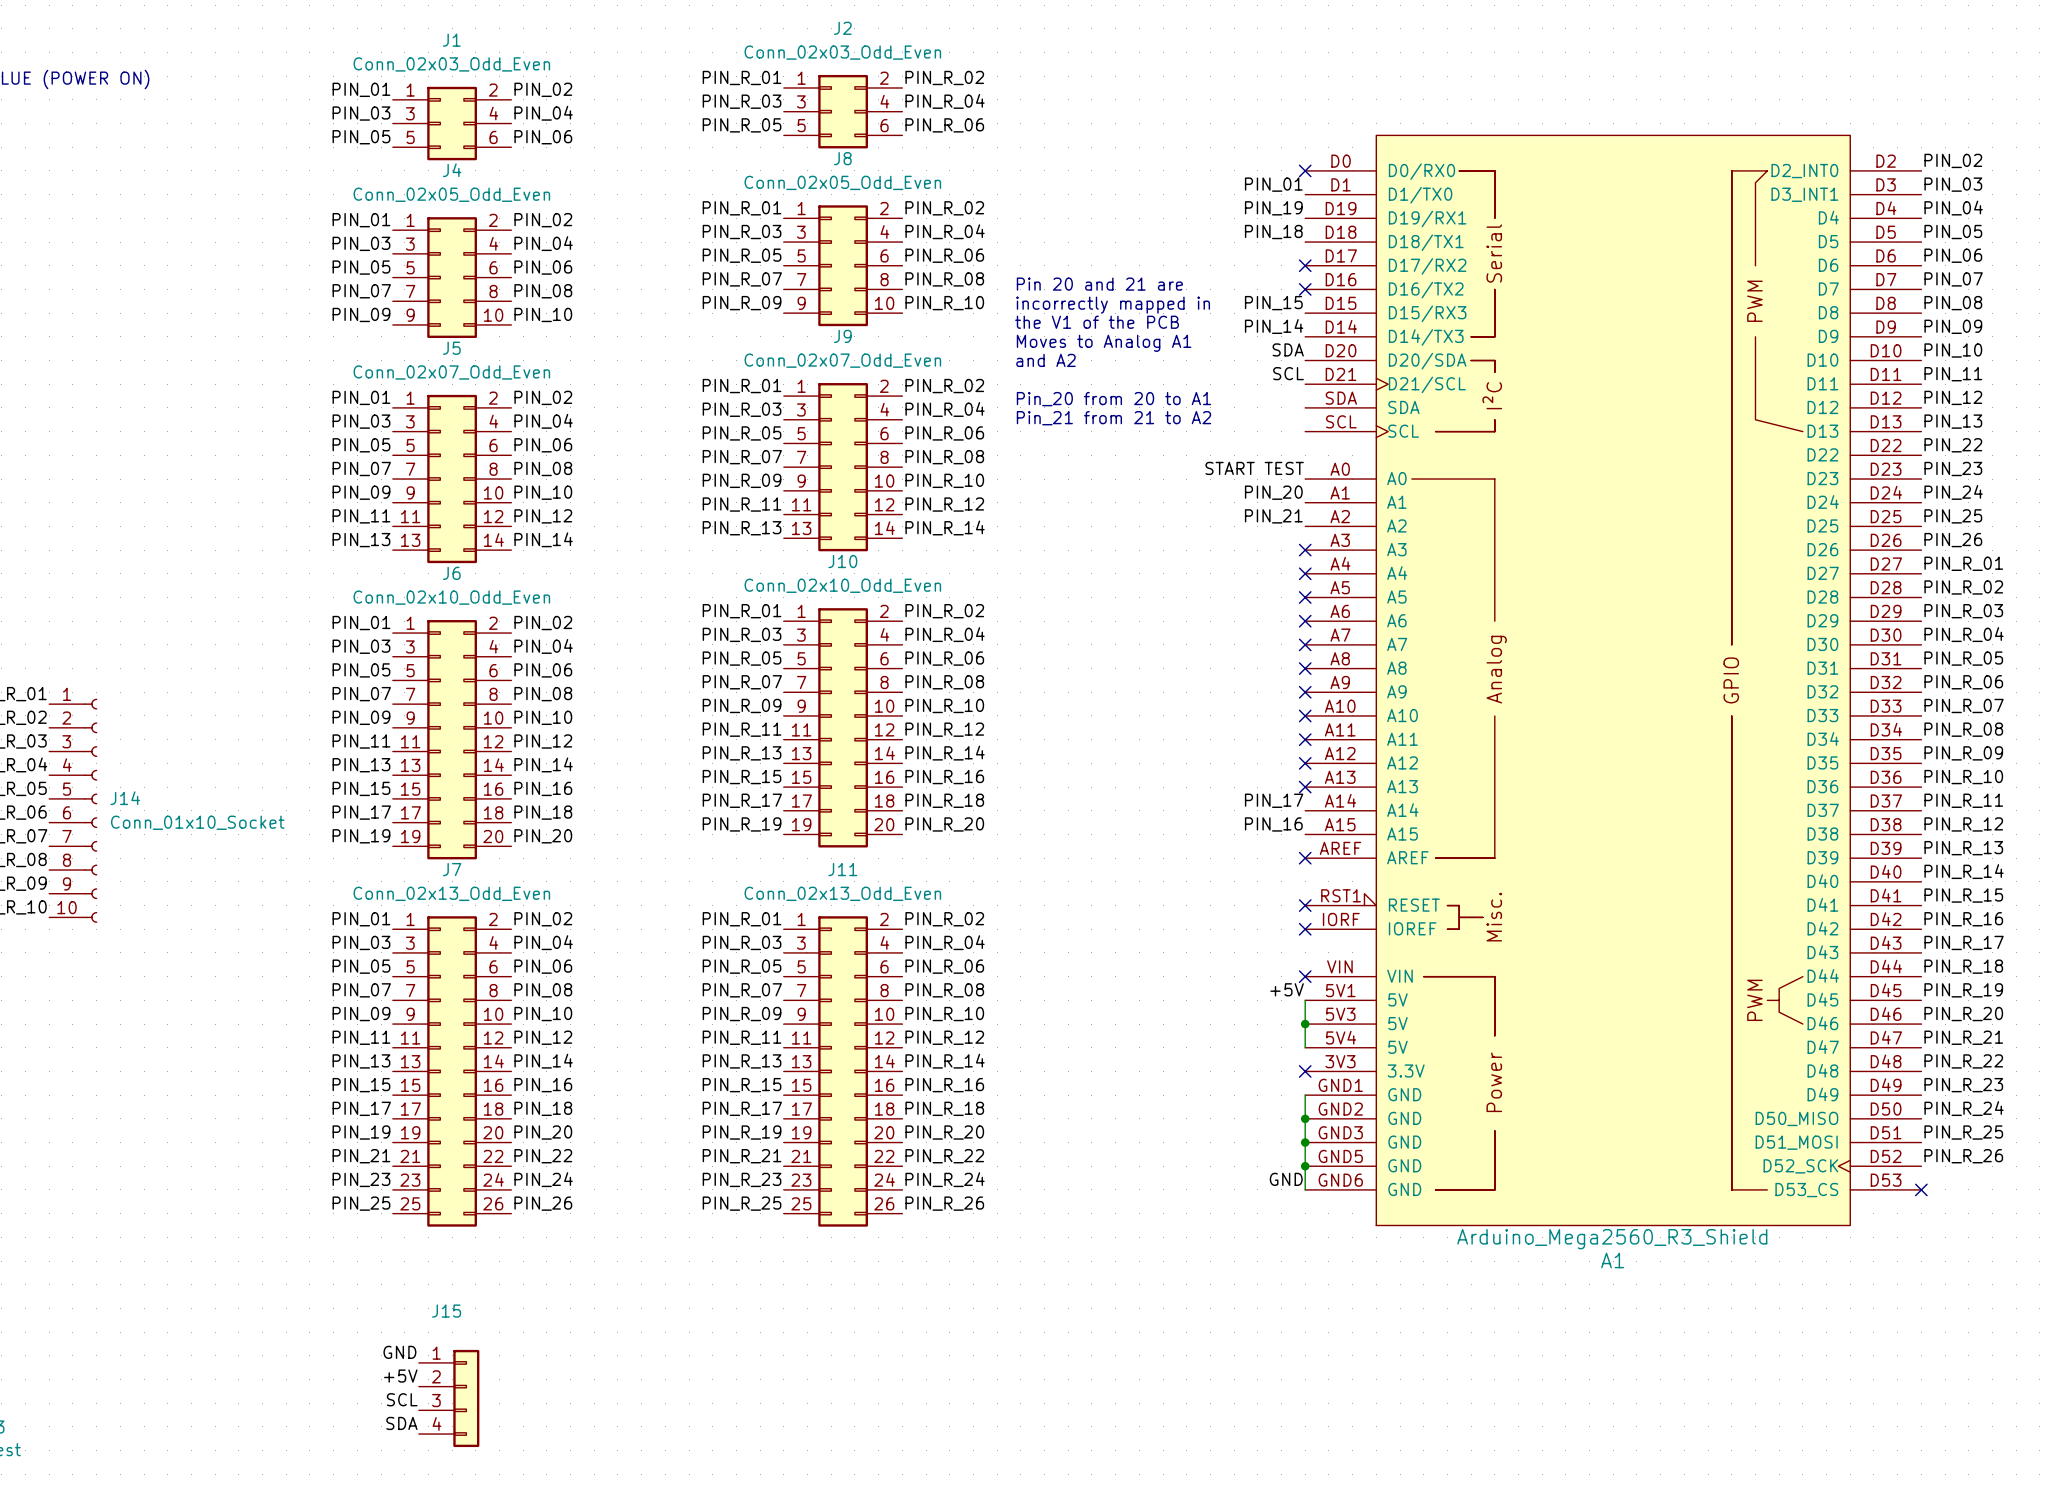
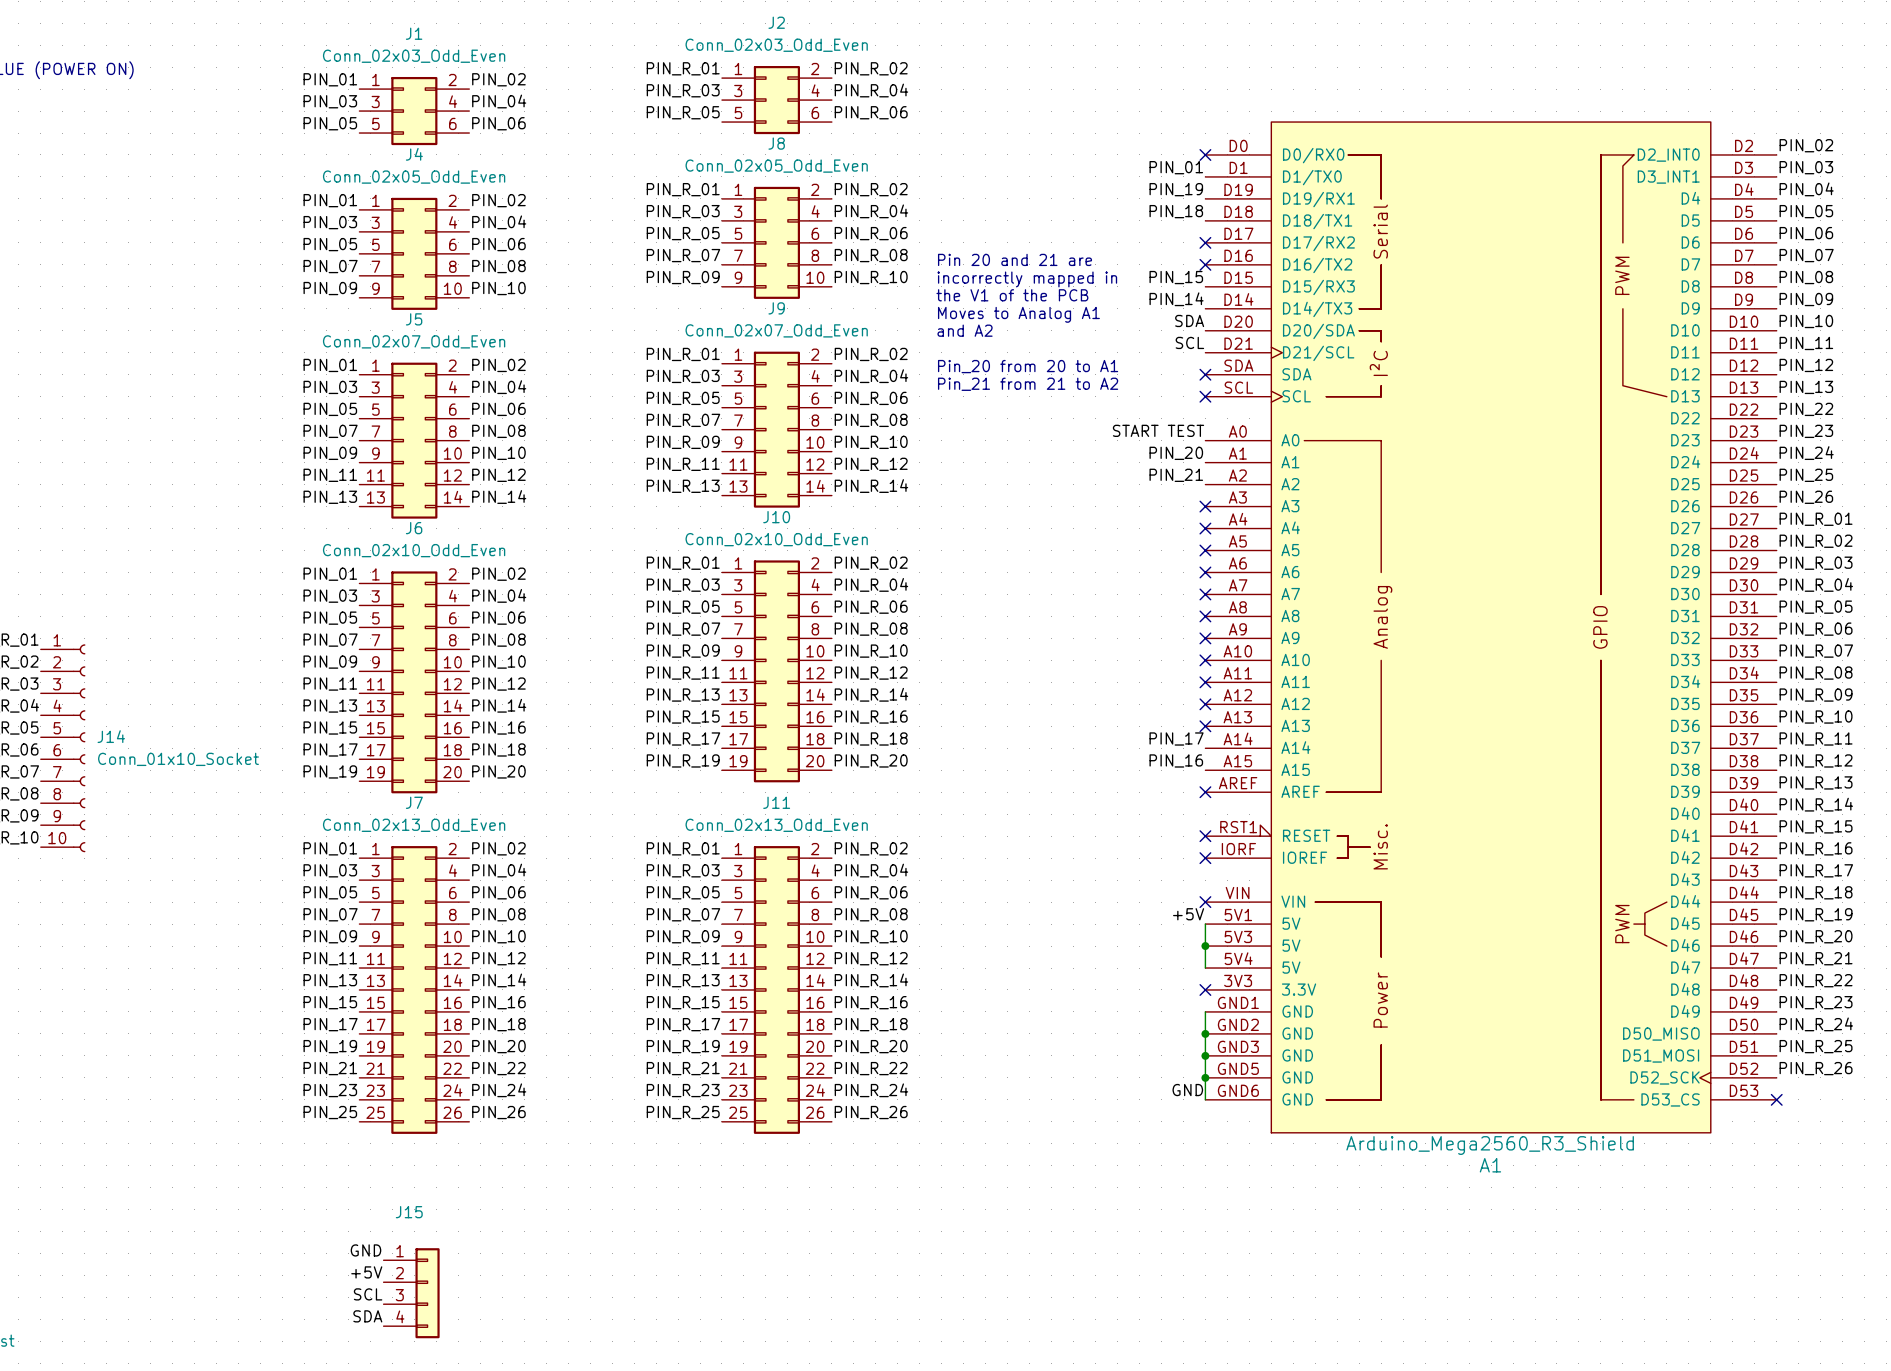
no-connect mark: none -> (1205, 374)
no-connect mark: none -> (1205, 396)

